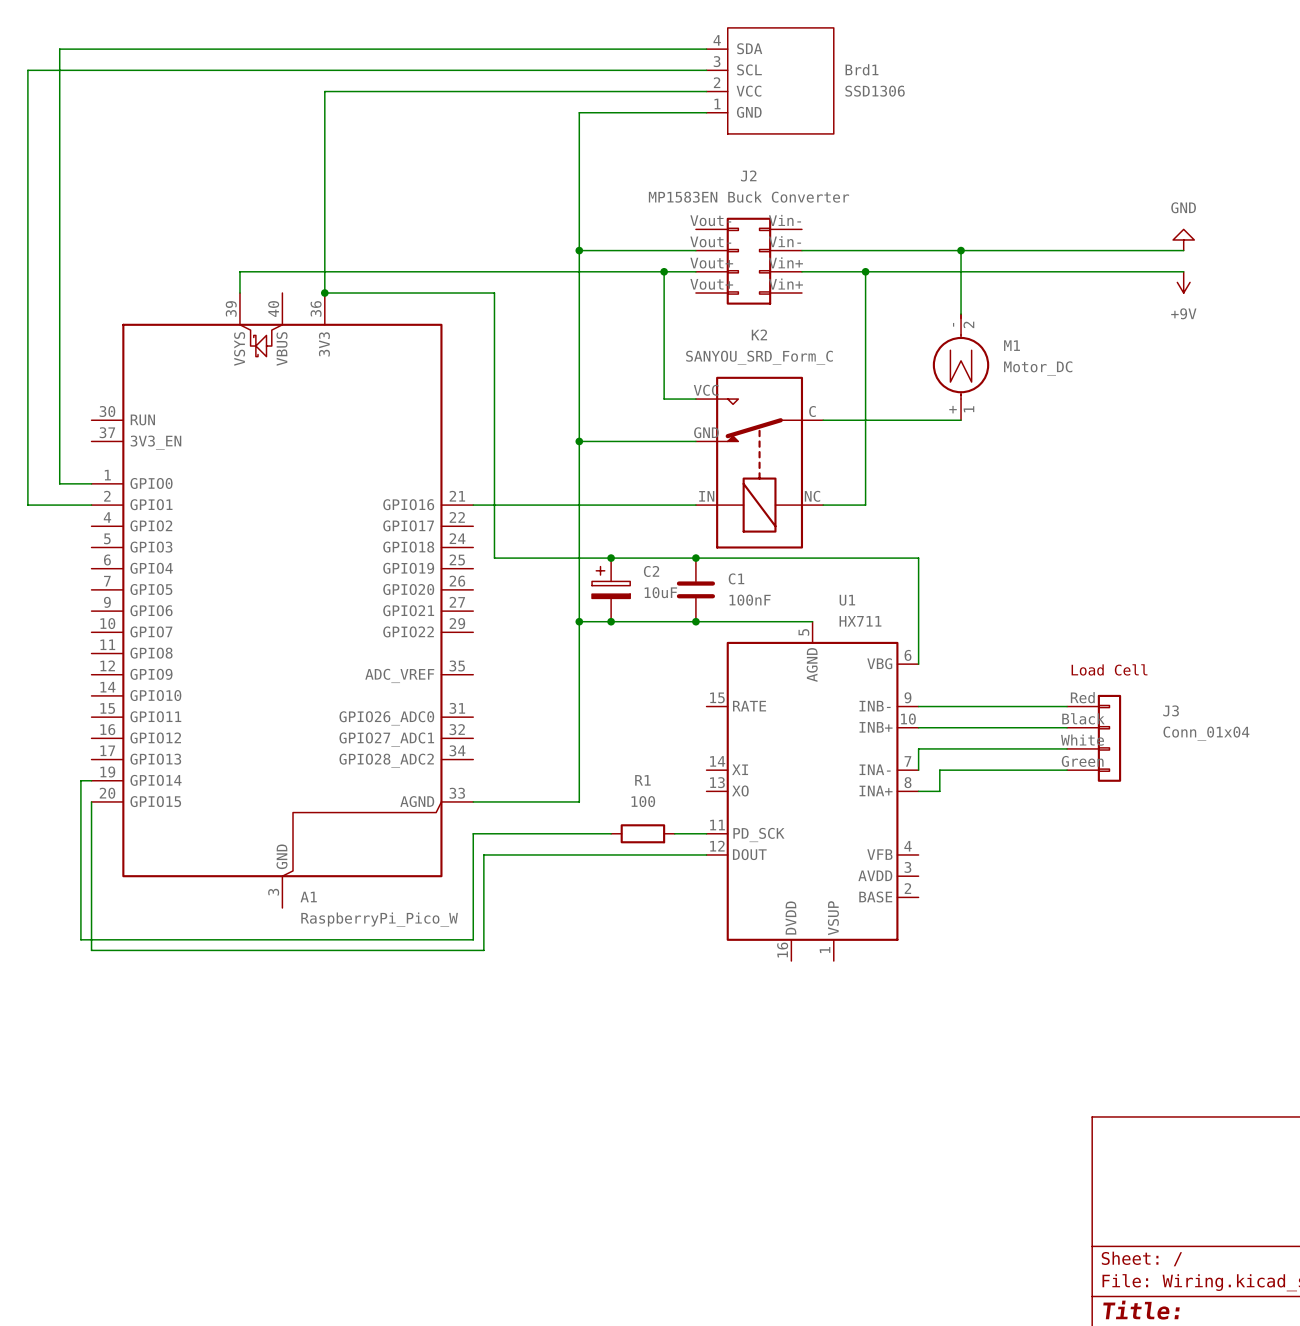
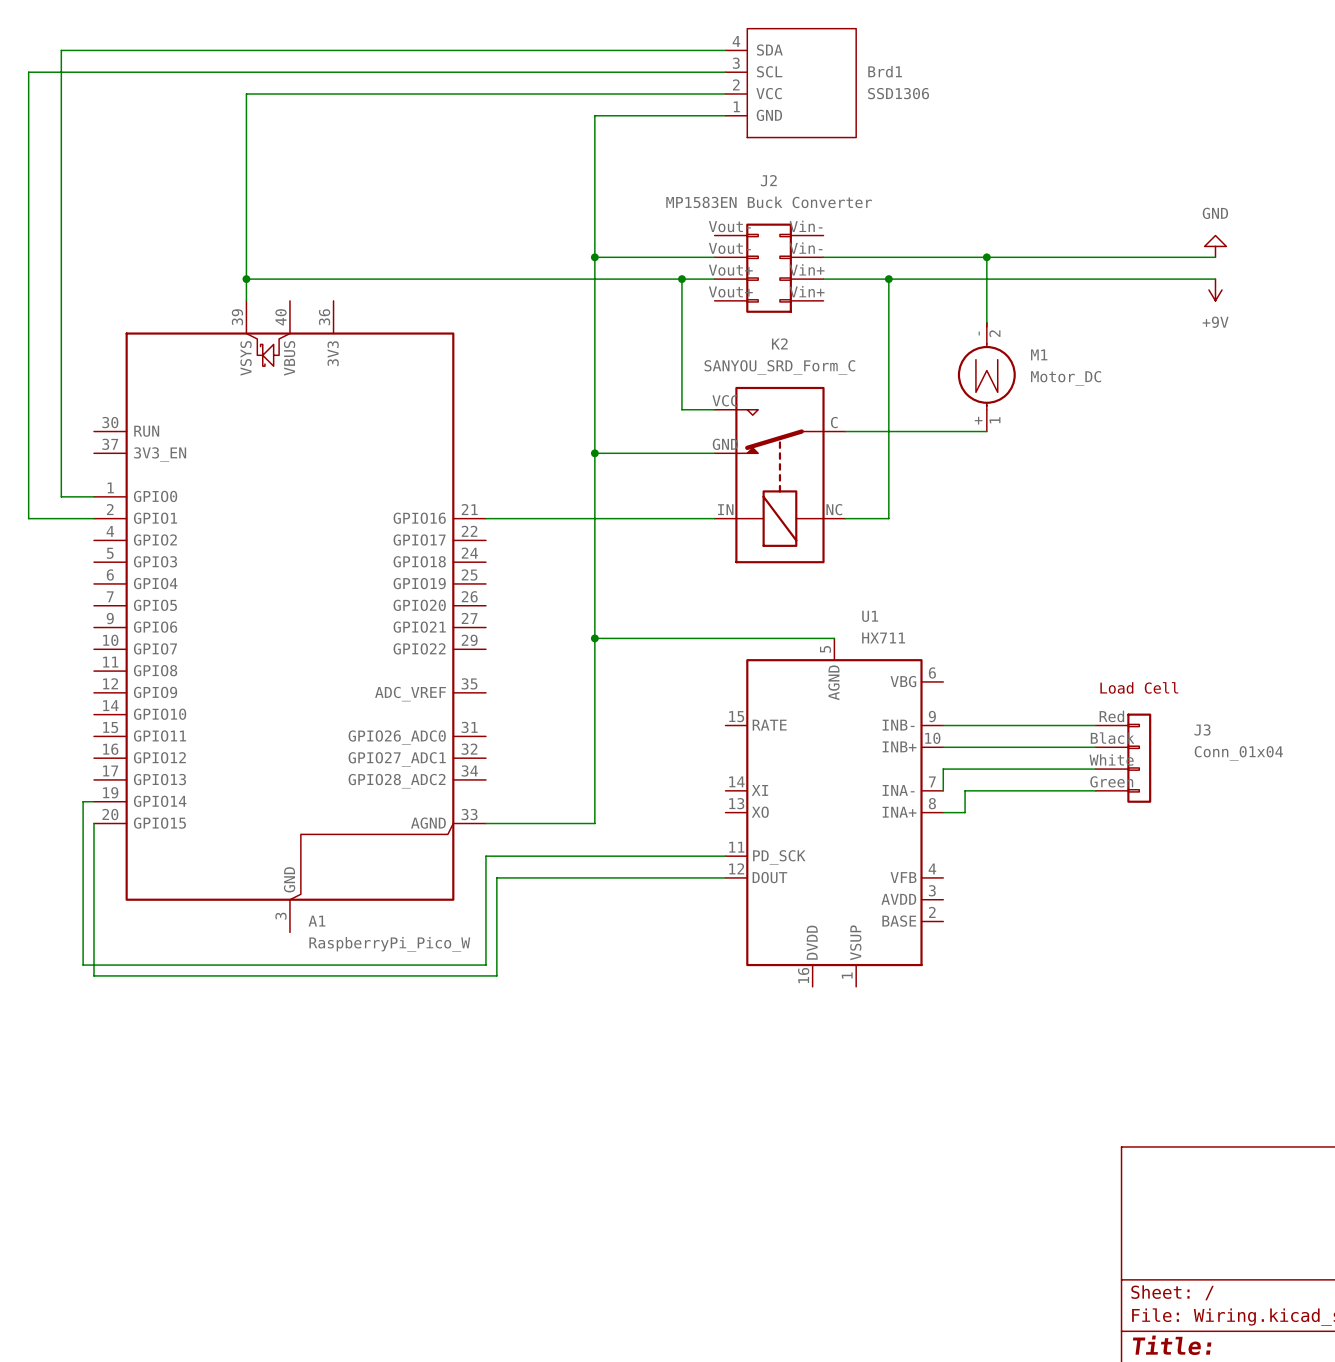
wire: (324, 91) (324, 293) (494, 293) (494, 558) (918, 558) (918, 664) -> (333, 93) (246, 93) (246, 279)
junction: none -> (246, 279)
junction: (324, 293) -> none
junction: (611, 558) -> none
junction: (695, 558) -> none
C2: 10uF (611, 589) -> none
C1: 100nF (695, 589) -> none
junction: (611, 621) -> none
junction: (695, 621) -> none
wire: none -> (627, 856) (692, 856)
R1: 100 (642, 833) -> none

